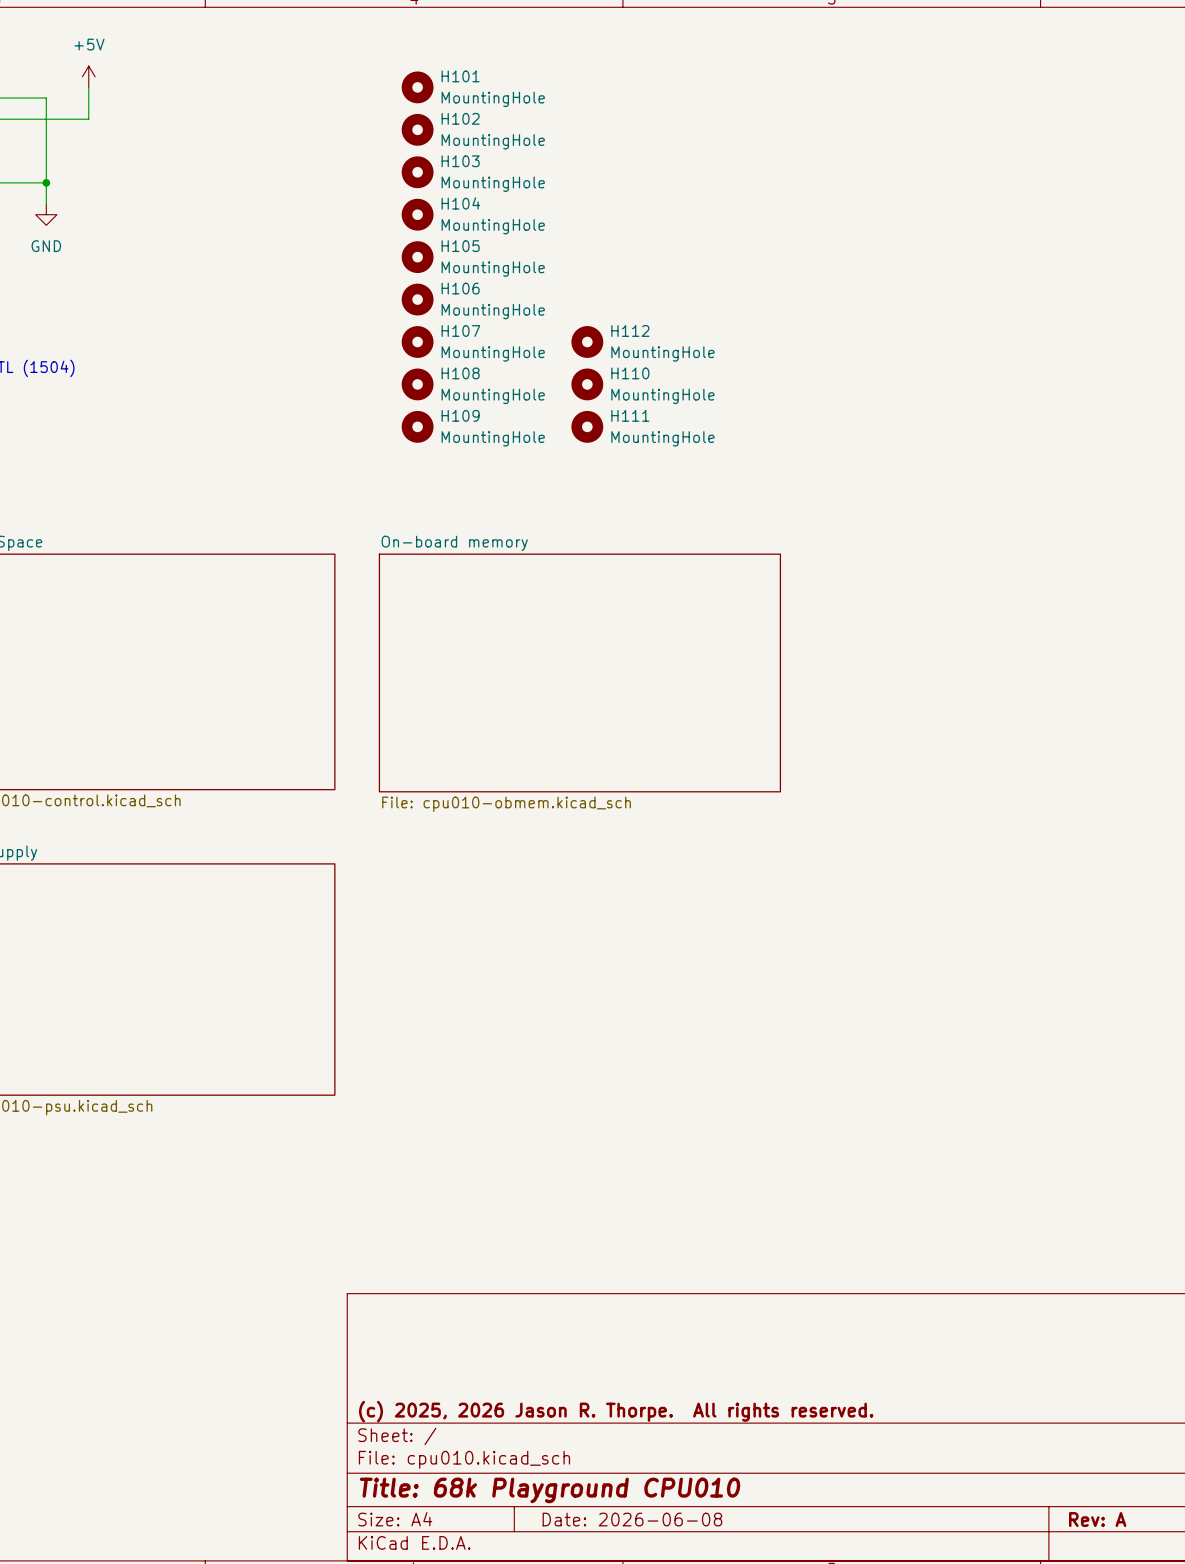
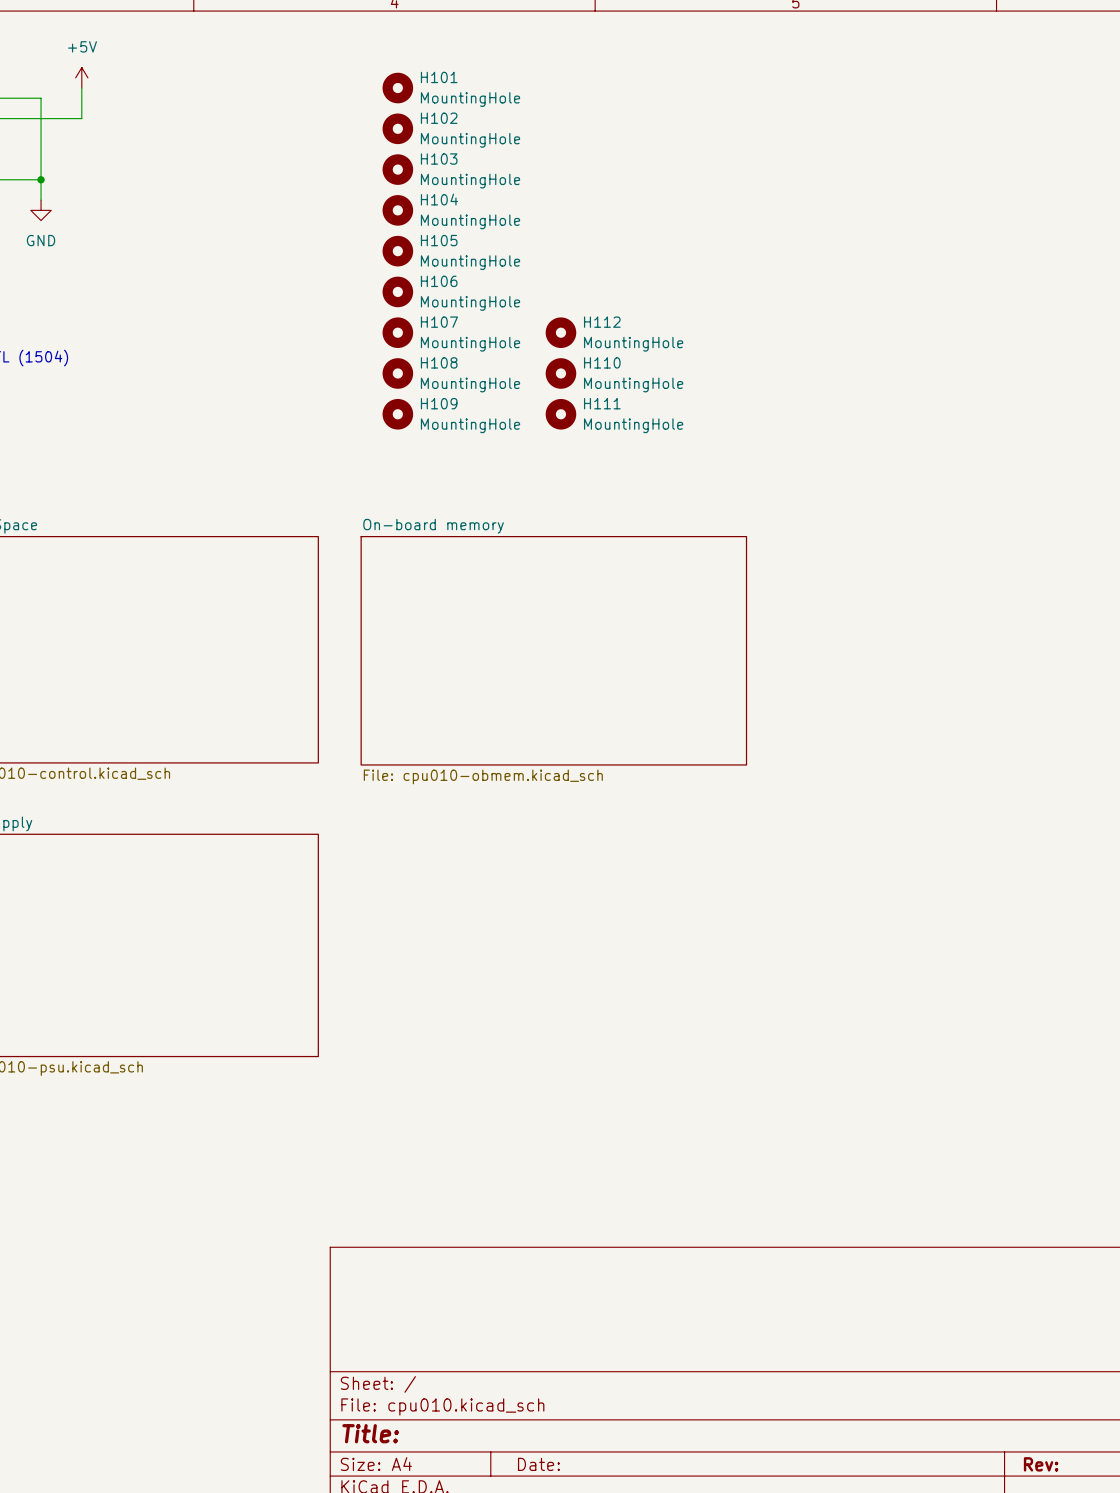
title block: (c) 2025, 2026 Jason R. Thorpe. All rights reserved. (616, 1411) -> none
title block: Title: 68k Playground CPU010 (550, 1490) -> Title: (370, 1433)
title block: Date: 2026-06-08 (632, 1519) -> Date: (538, 1464)
title block: Rev: A (1097, 1519) -> Rev: (1041, 1464)

